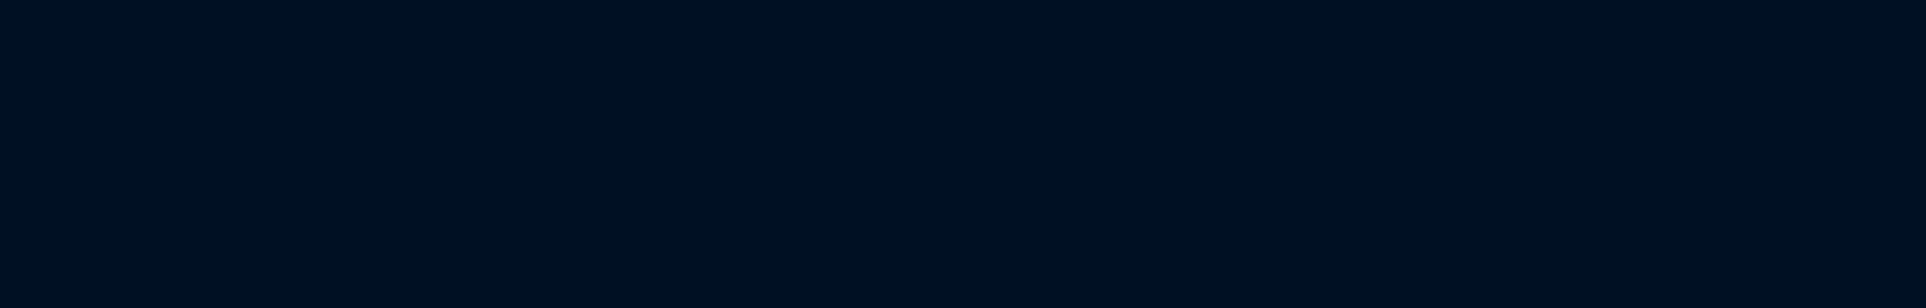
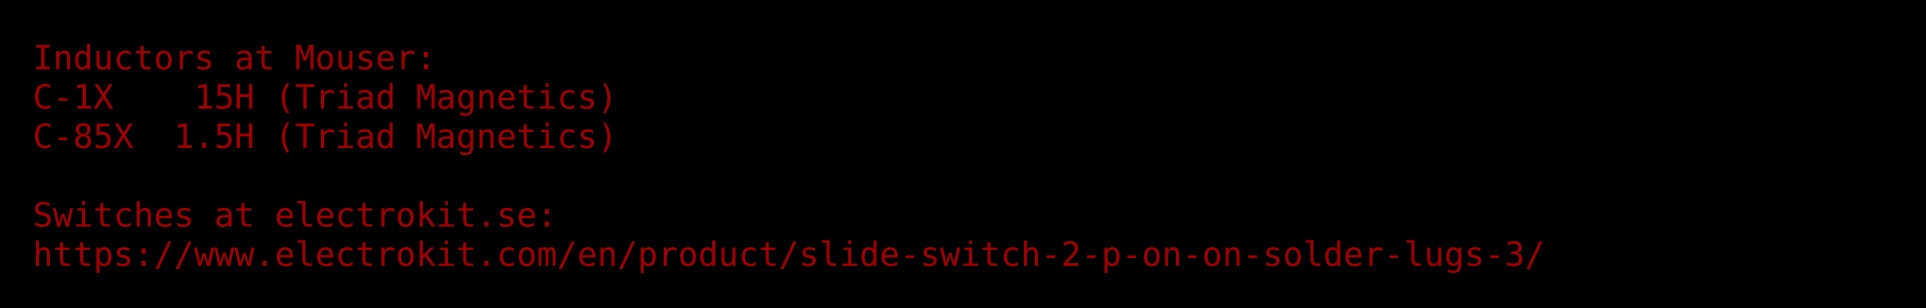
text: none -> Inductors at Mouser: (232, 56)
text: none -> C-1X 15H (Triad Magnetics) (322, 99)
text: none -> C-85X 1.5H (Triad Magnetics) (322, 138)
text: none -> Switches at electrokit.se: (292, 214)
text: none -> https://www.electrokit.com/en/product/slide-switch-2-p-on-on-solder-lugs-3/ (789, 256)

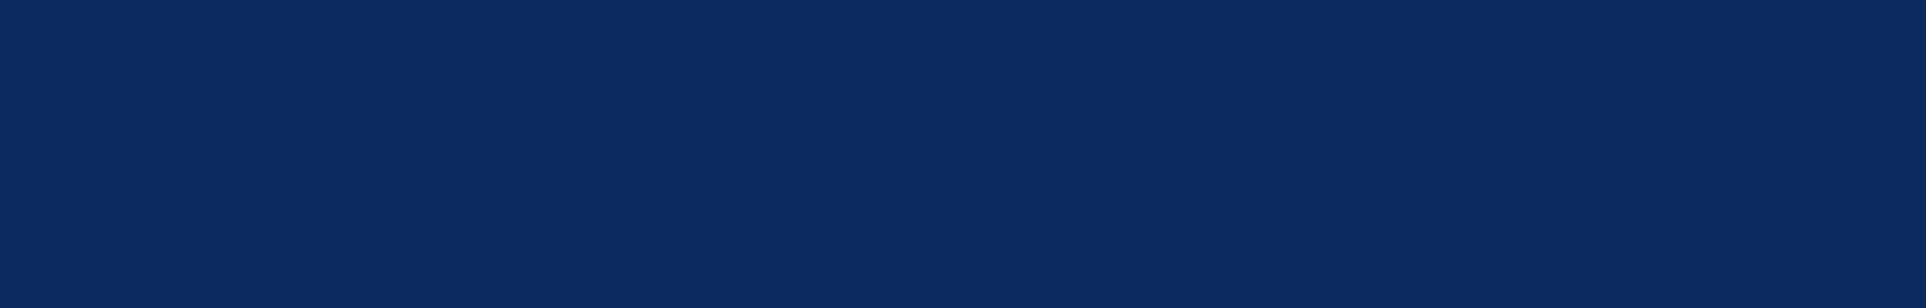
text: Inductors at Mouser: (232, 56) -> none
text: C-1X 15H (Triad Magnetics) (322, 99) -> none
text: C-85X 1.5H (Triad Magnetics) (322, 138) -> none
text: Switches at electrokit.se: (292, 214) -> none
text: https://www.electrokit.com/en/product/slide-switch-2-p-on-on-solder-lugs-3/ (789, 256) -> none

